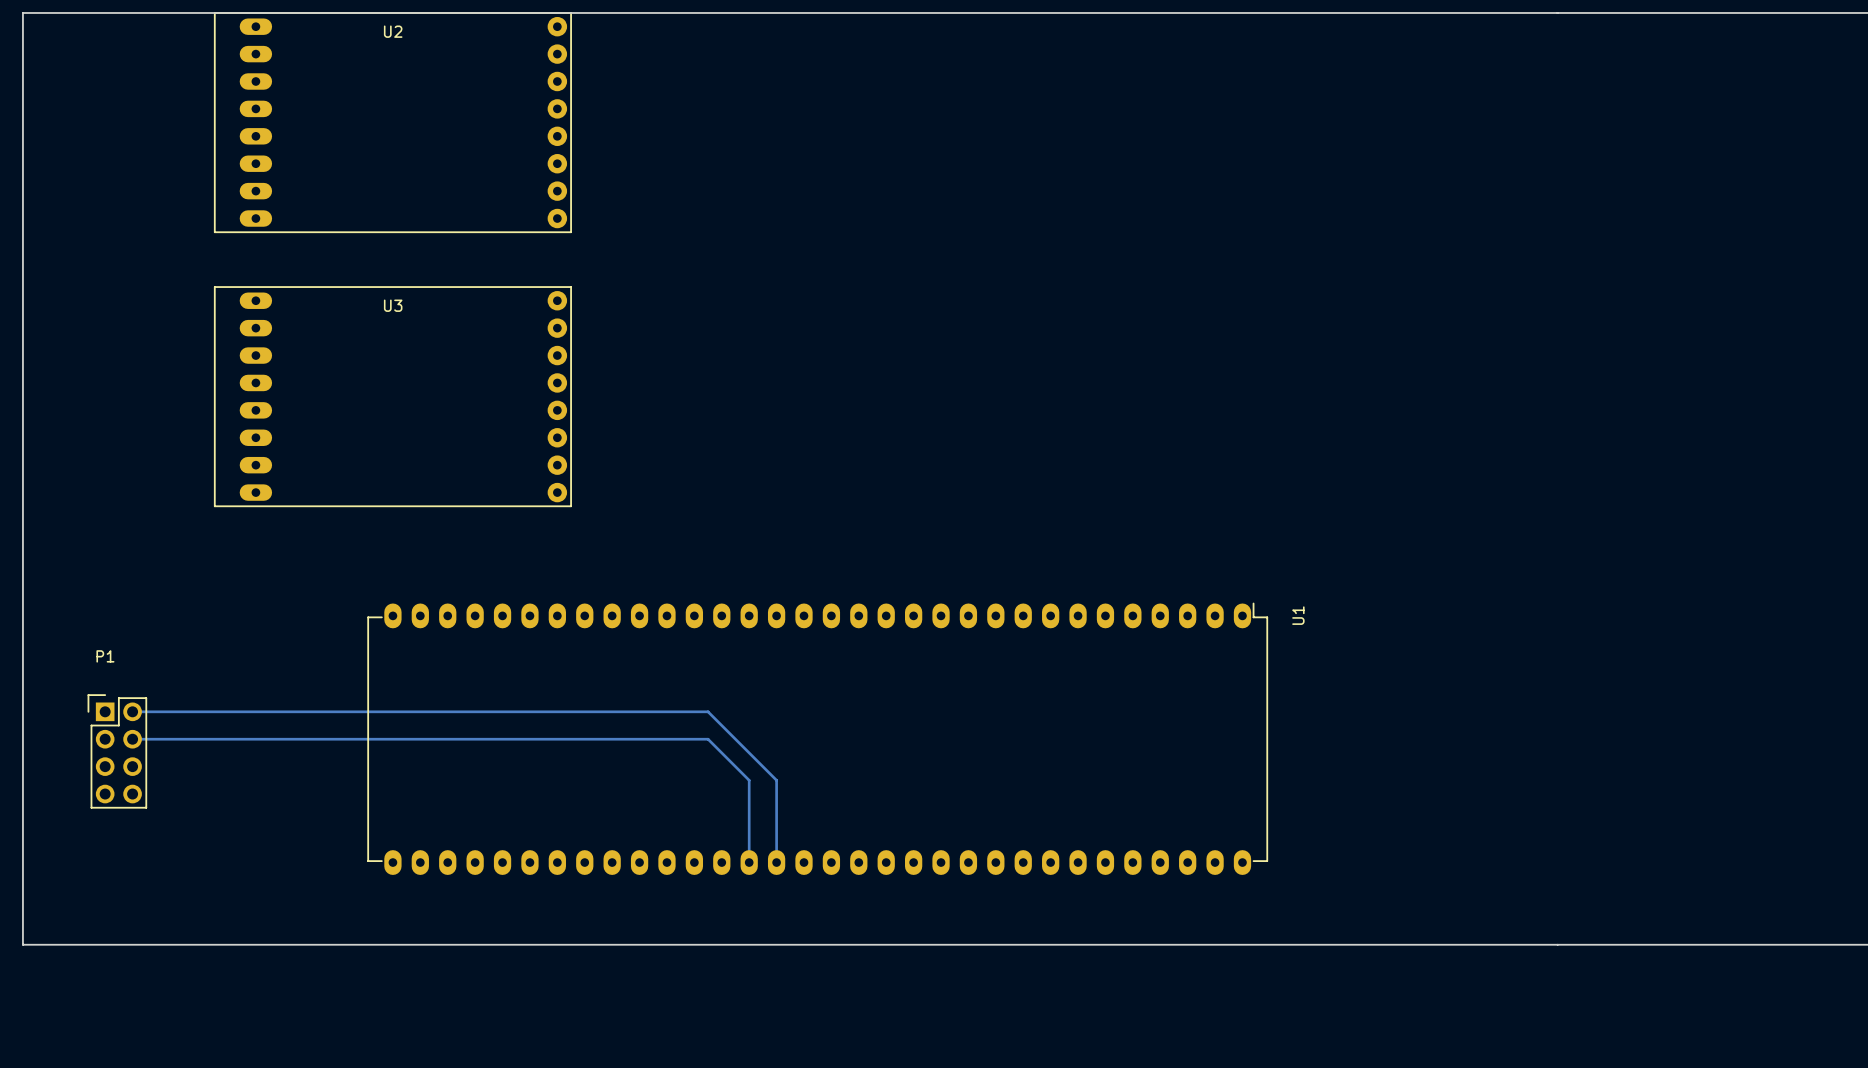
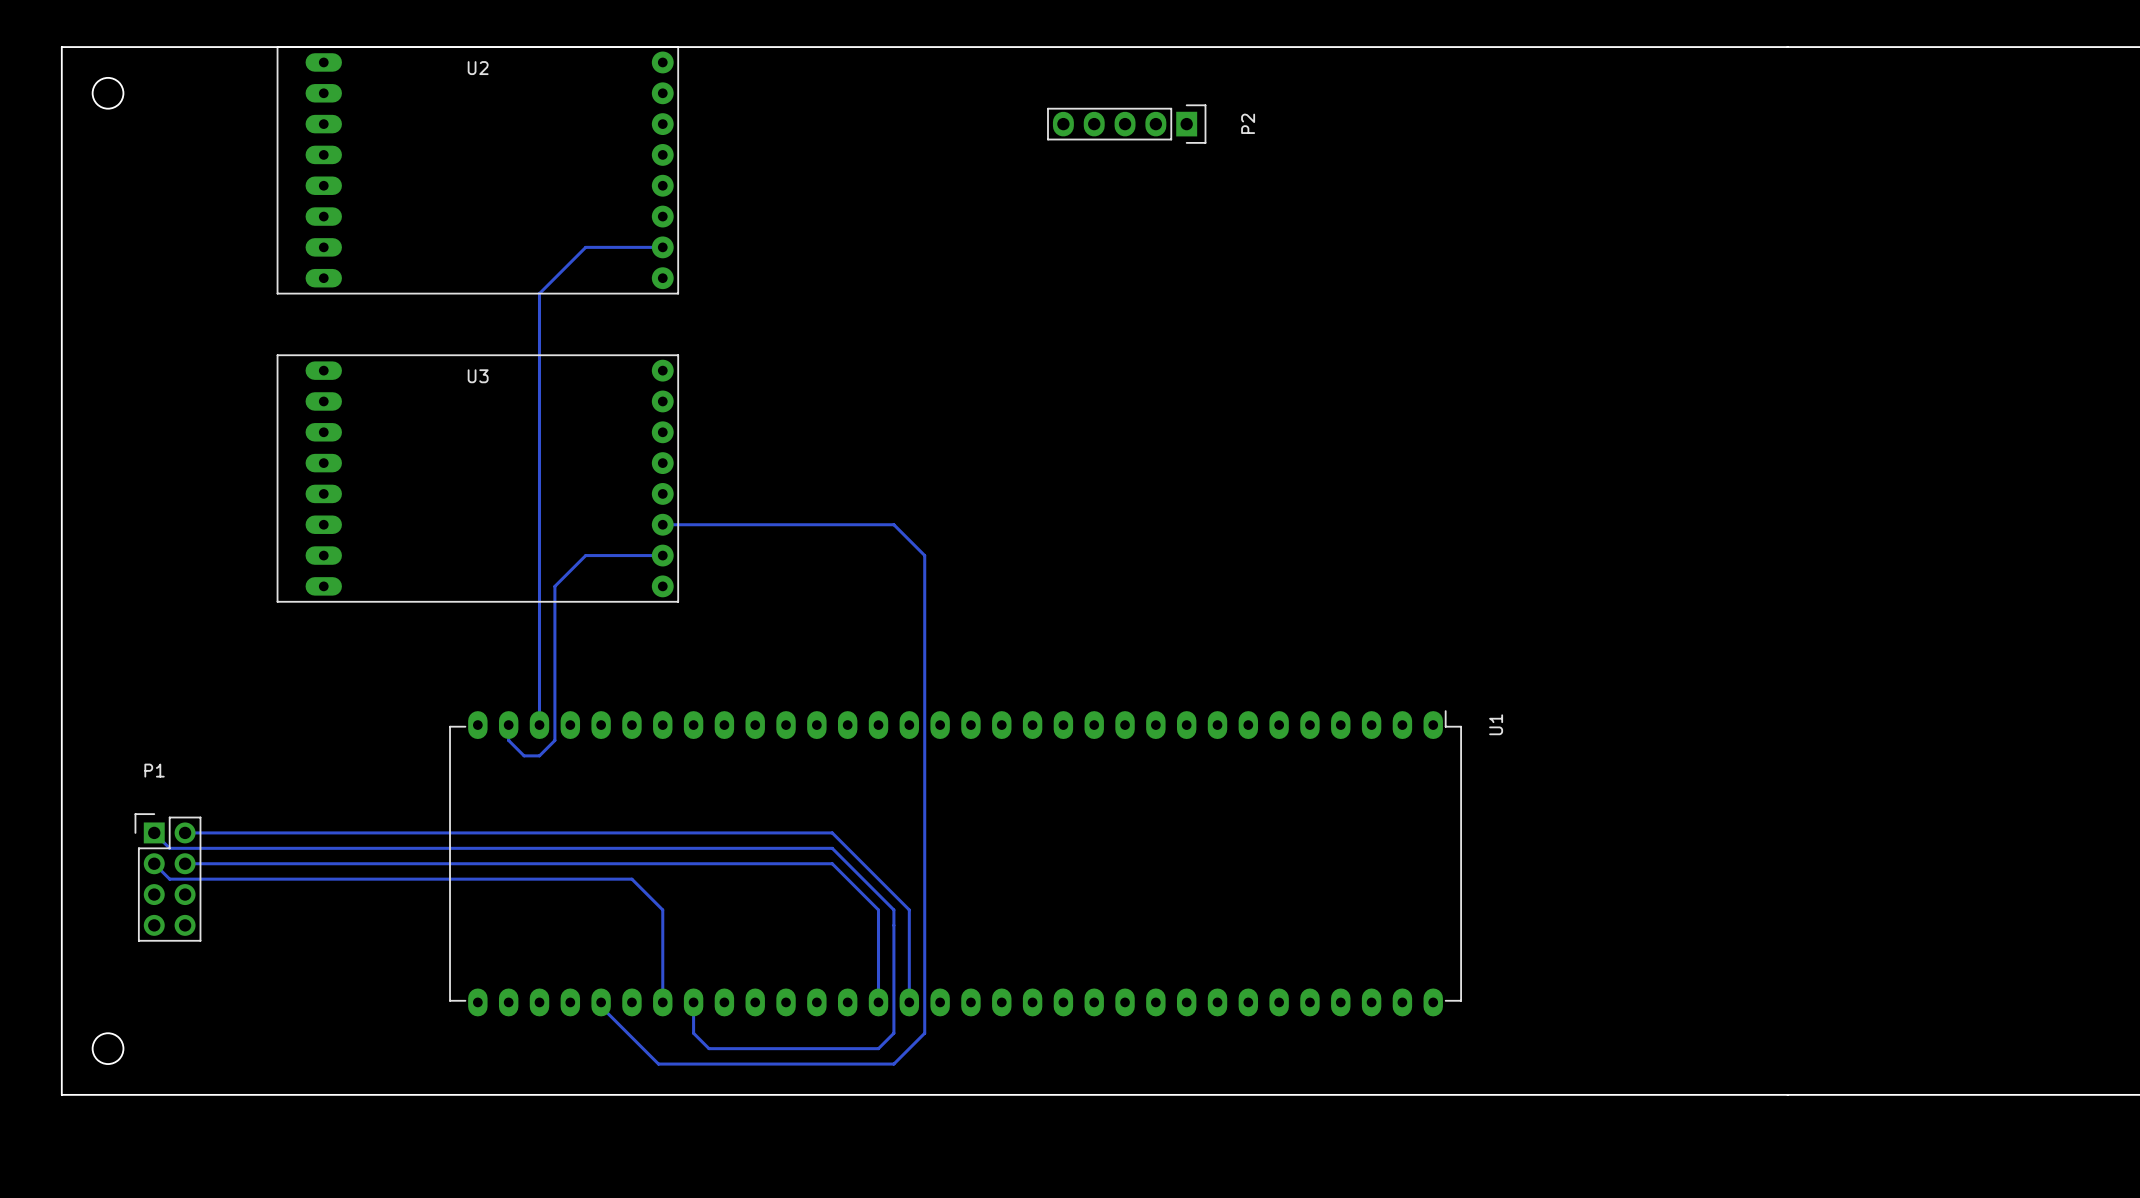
round board edge: none -> [91, 76, 125, 110]
P2: none -> (1126, 124)
bottom track: none -> (662, 247) (585, 247) (539, 293) (539, 725)
bottom track: none -> (662, 524) (893, 524) (924, 555) (924, 1033) (893, 1064) (658, 1064) (601, 1006) (601, 1002)
bottom track: none -> (662, 555) (585, 555) (554, 586) (554, 740) (539, 755) (524, 755) (508, 740) (508, 725)
bottom track: none -> (154, 832) (169, 848) (832, 848) (893, 909) (893, 1033) (878, 1048) (708, 1048) (693, 1033) (693, 1002)
bottom track: none -> (154, 863) (169, 879) (631, 879) (662, 909) (662, 1002)
round board edge: none -> [91, 1032, 125, 1065]

